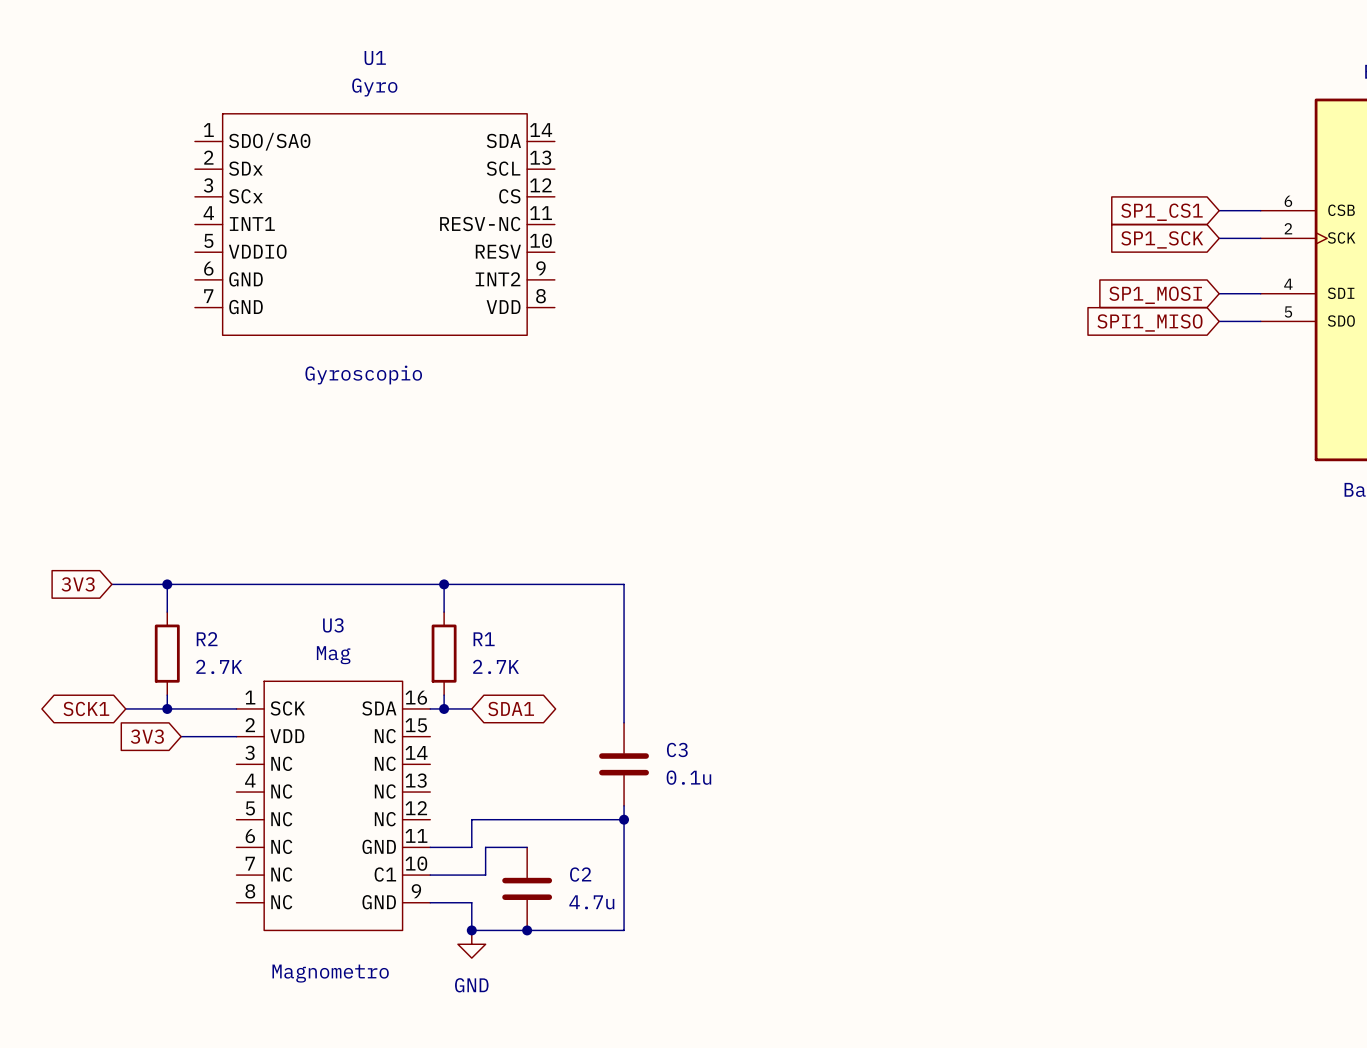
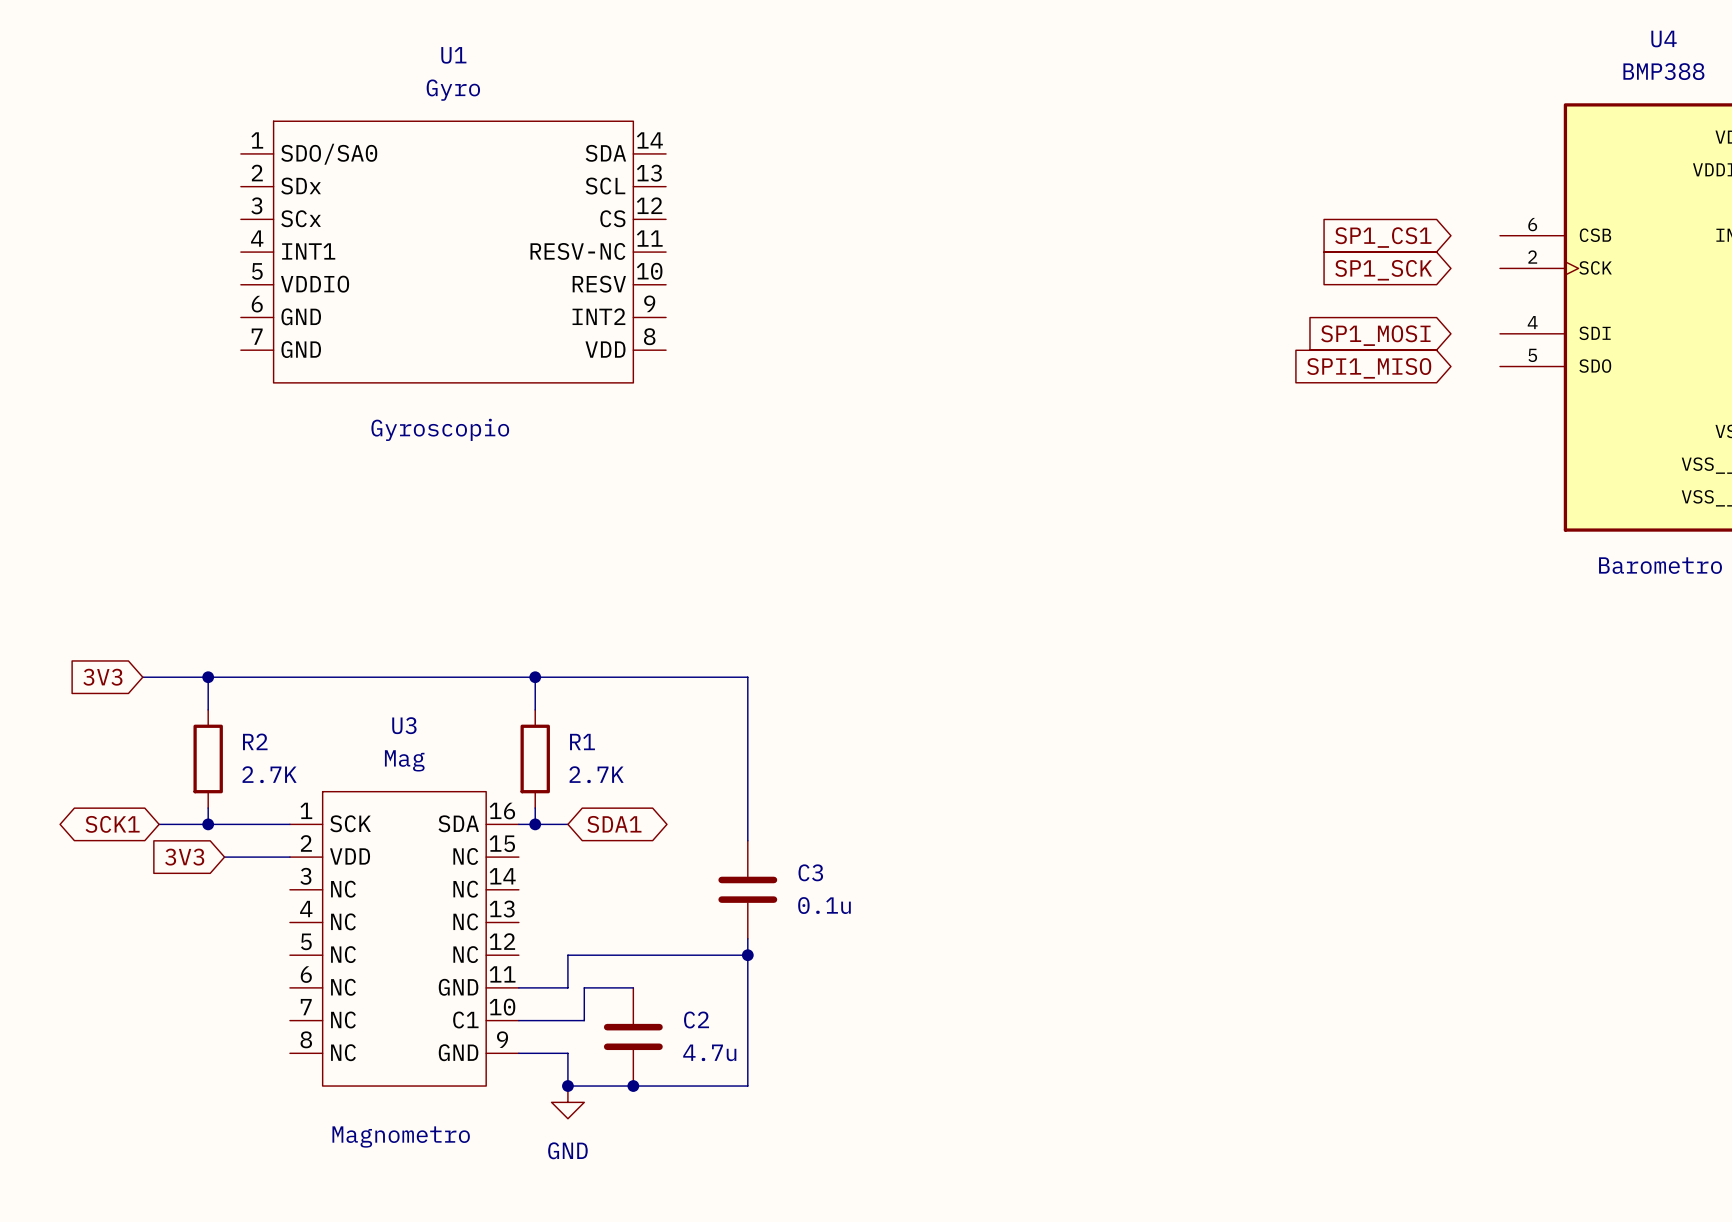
wire: (1219, 210) (1260, 210) -> none
wire: (1219, 238) (1260, 238) -> none
wire: (1219, 293) (1260, 293) -> none
wire: (1219, 321) (1260, 321) -> none

